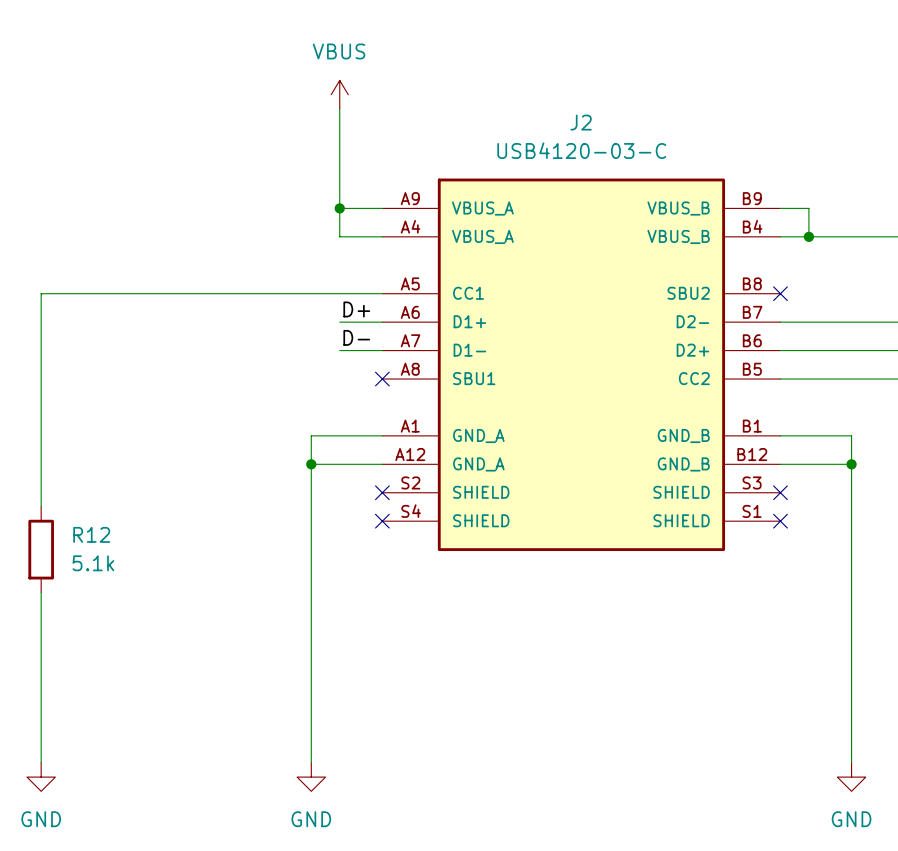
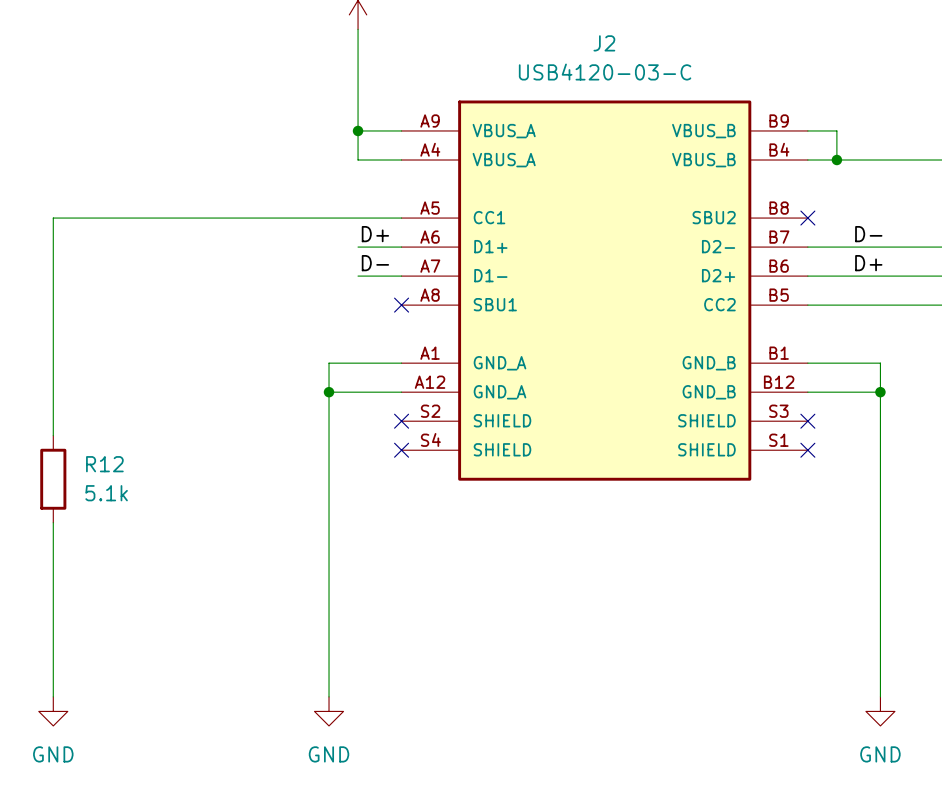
label: none -> D- (868, 234)
label: none -> D+ (868, 263)

